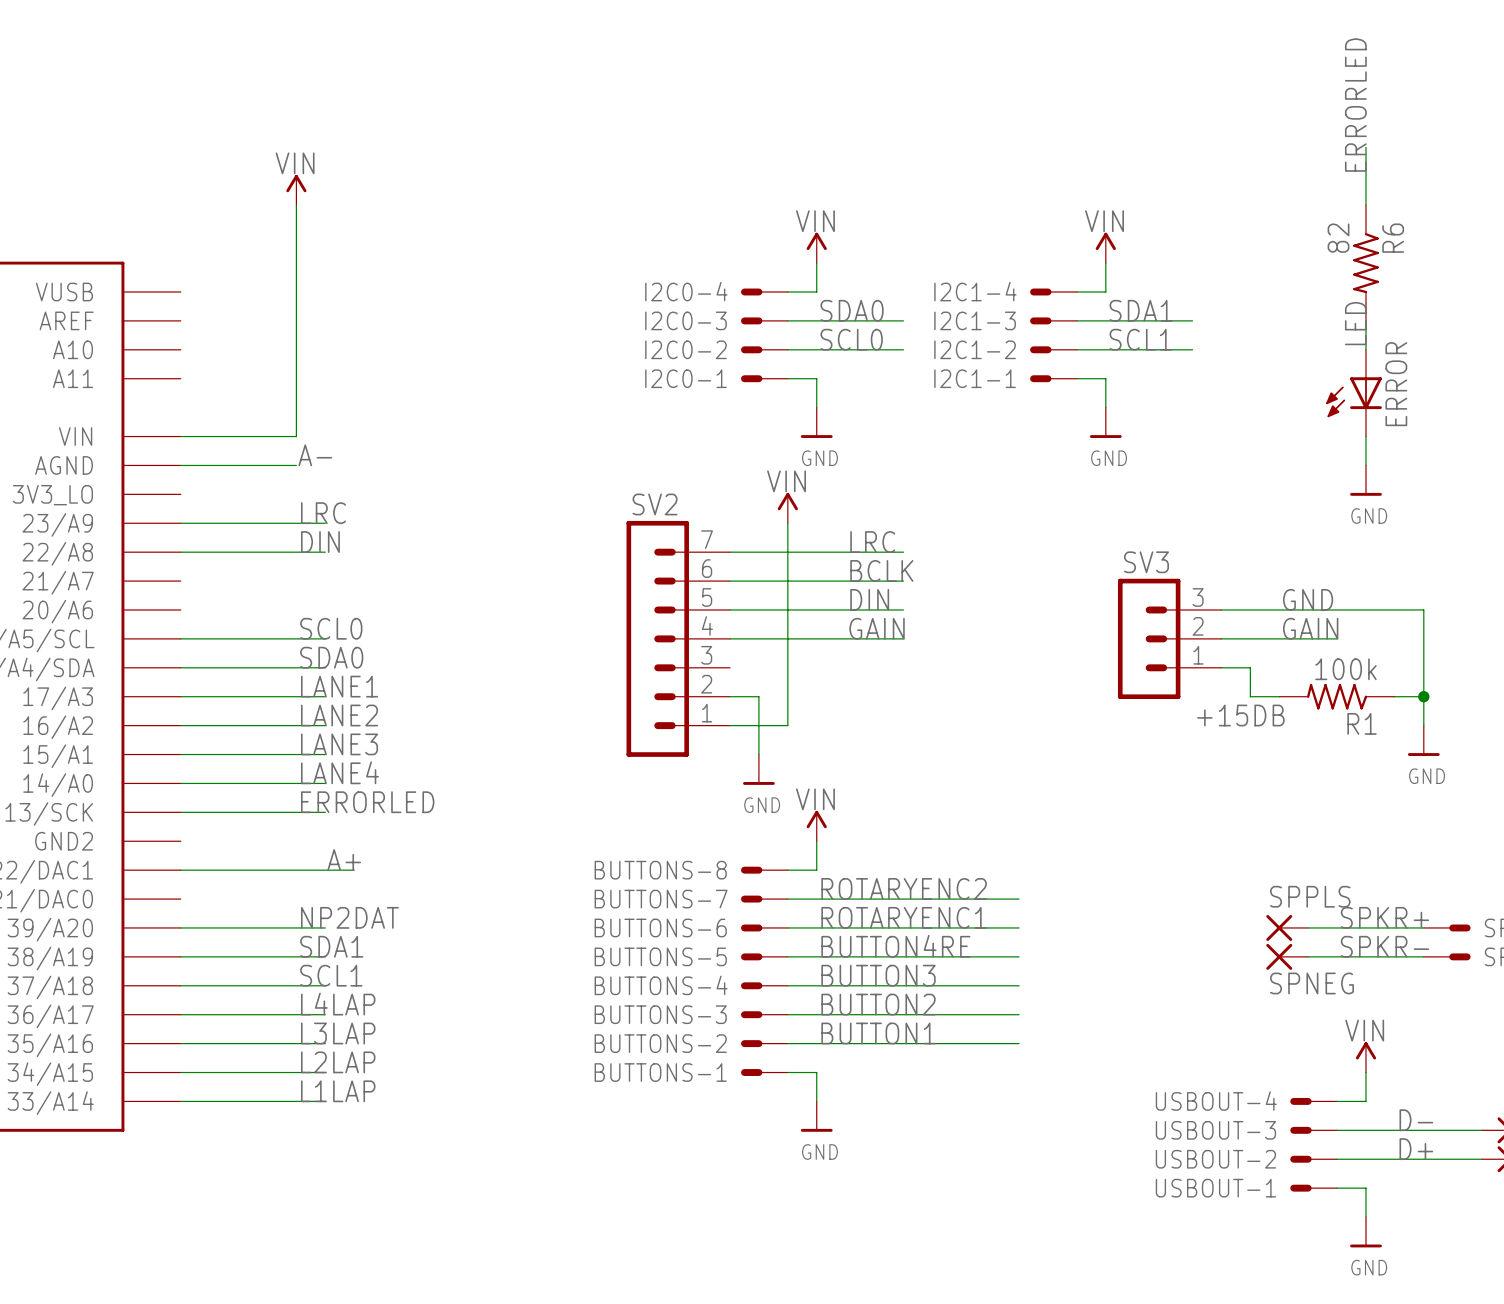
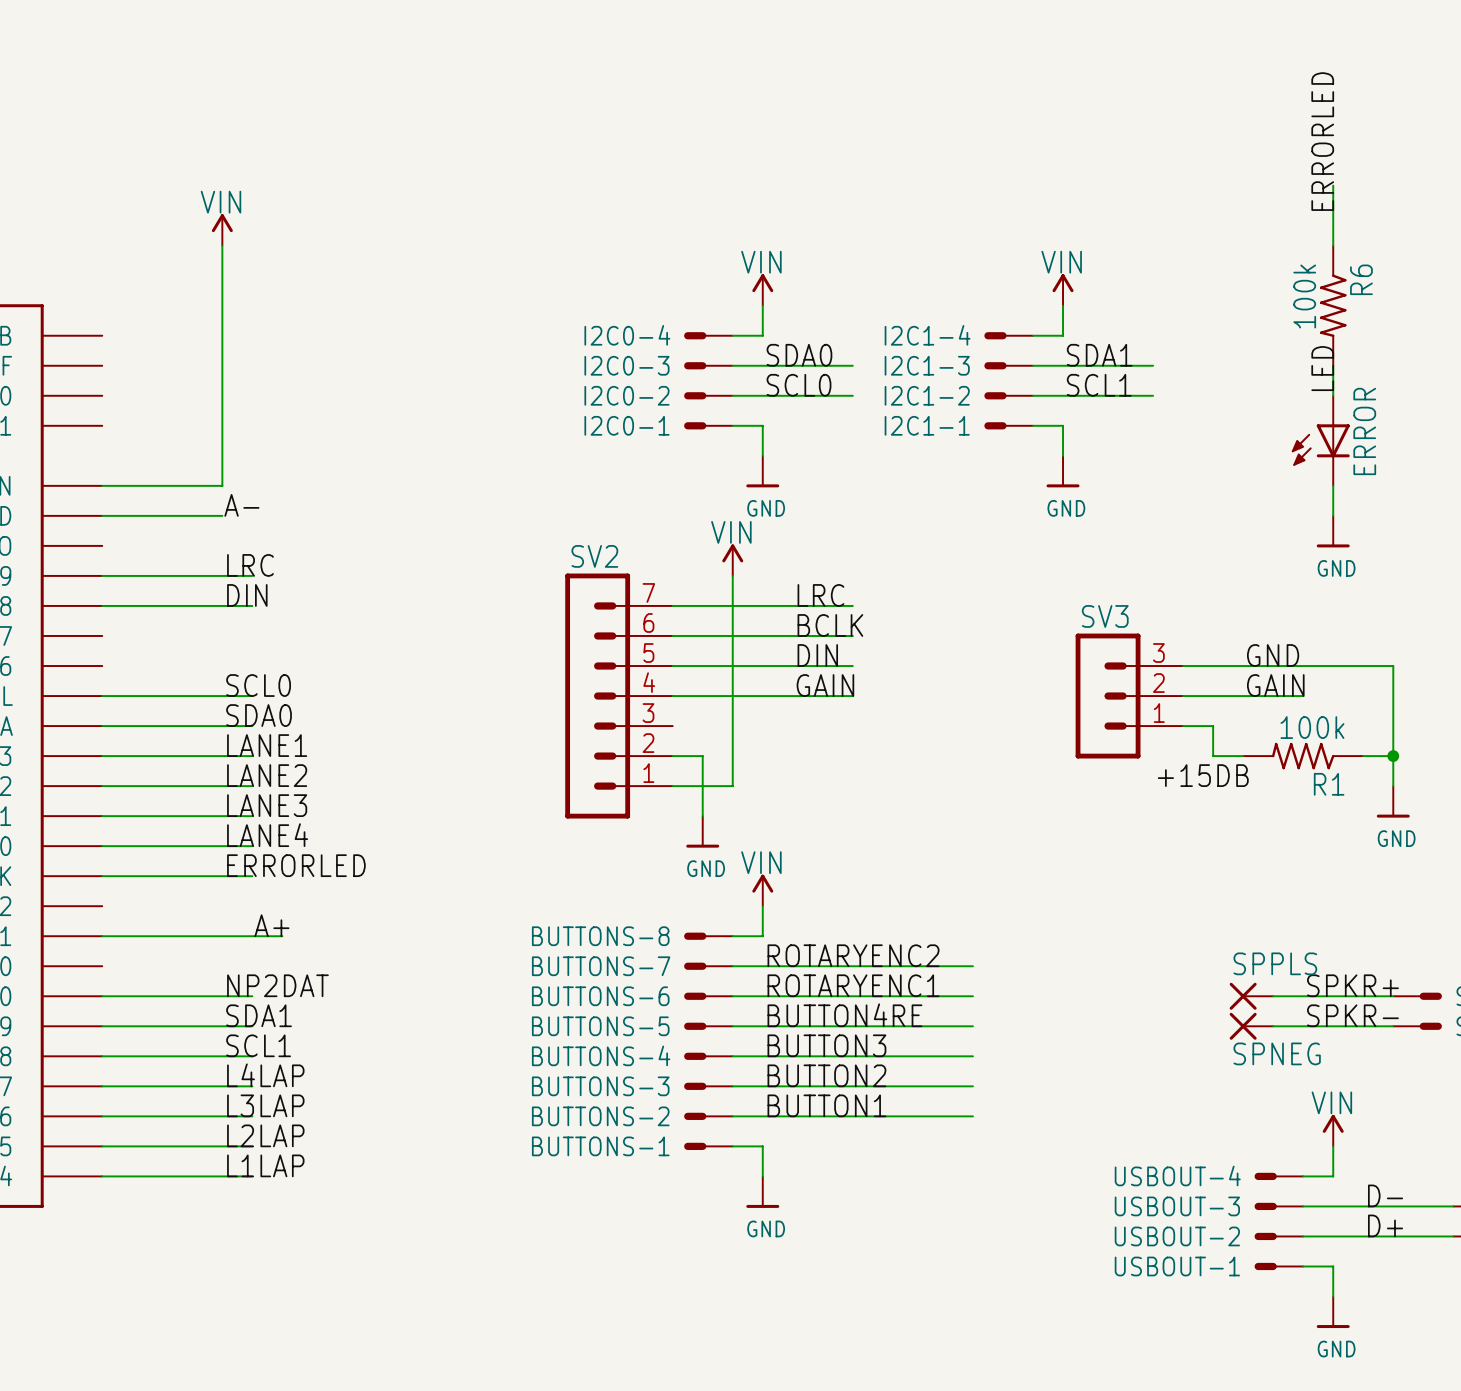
R6 value: 82 (1338, 238) -> 100k (1304, 296)

